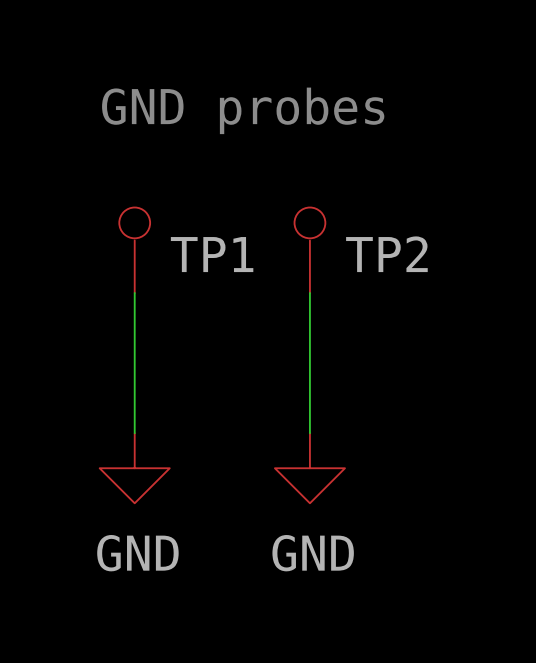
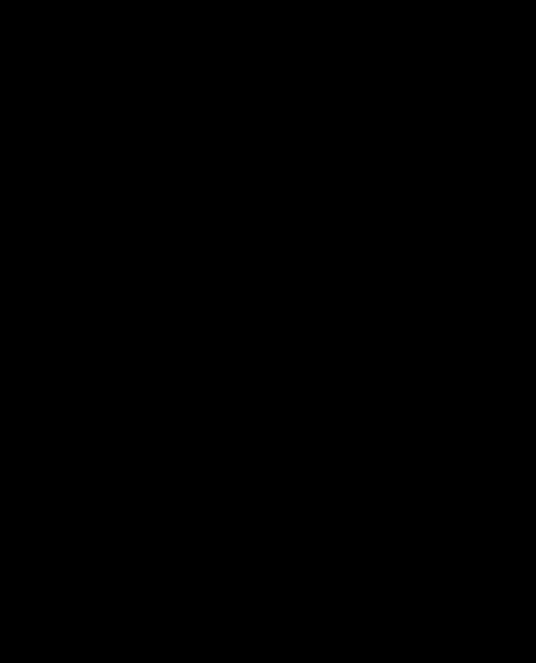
text: GND probes (243, 110) -> none
TP1: (134, 250) -> none
TP2: (309, 250) -> none
wire: (134, 293) (134, 433) -> none
wire: (309, 293) (309, 433) -> none
power symbol: GND (134, 468) -> none
power symbol: GND (309, 468) -> none

